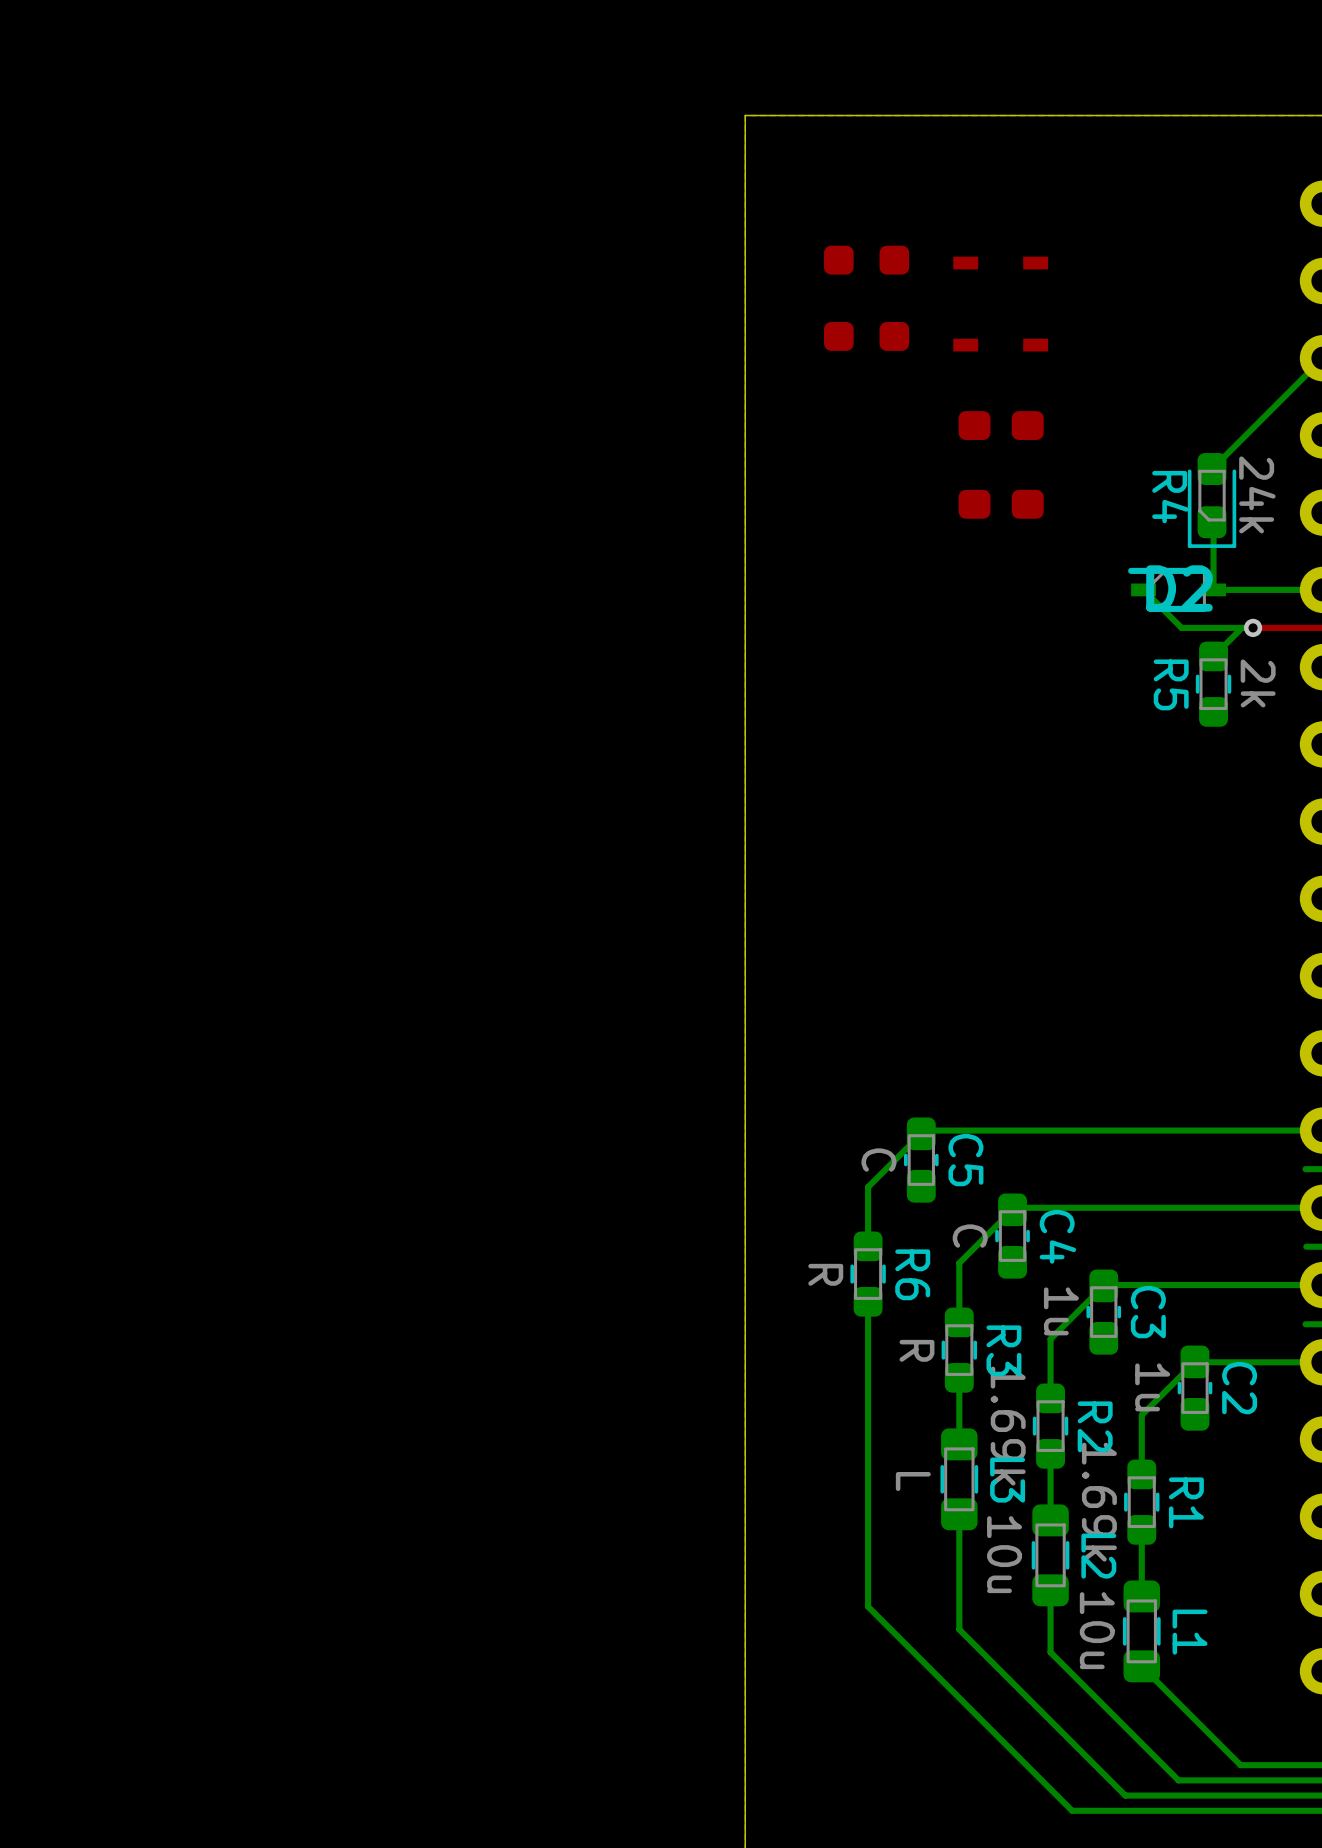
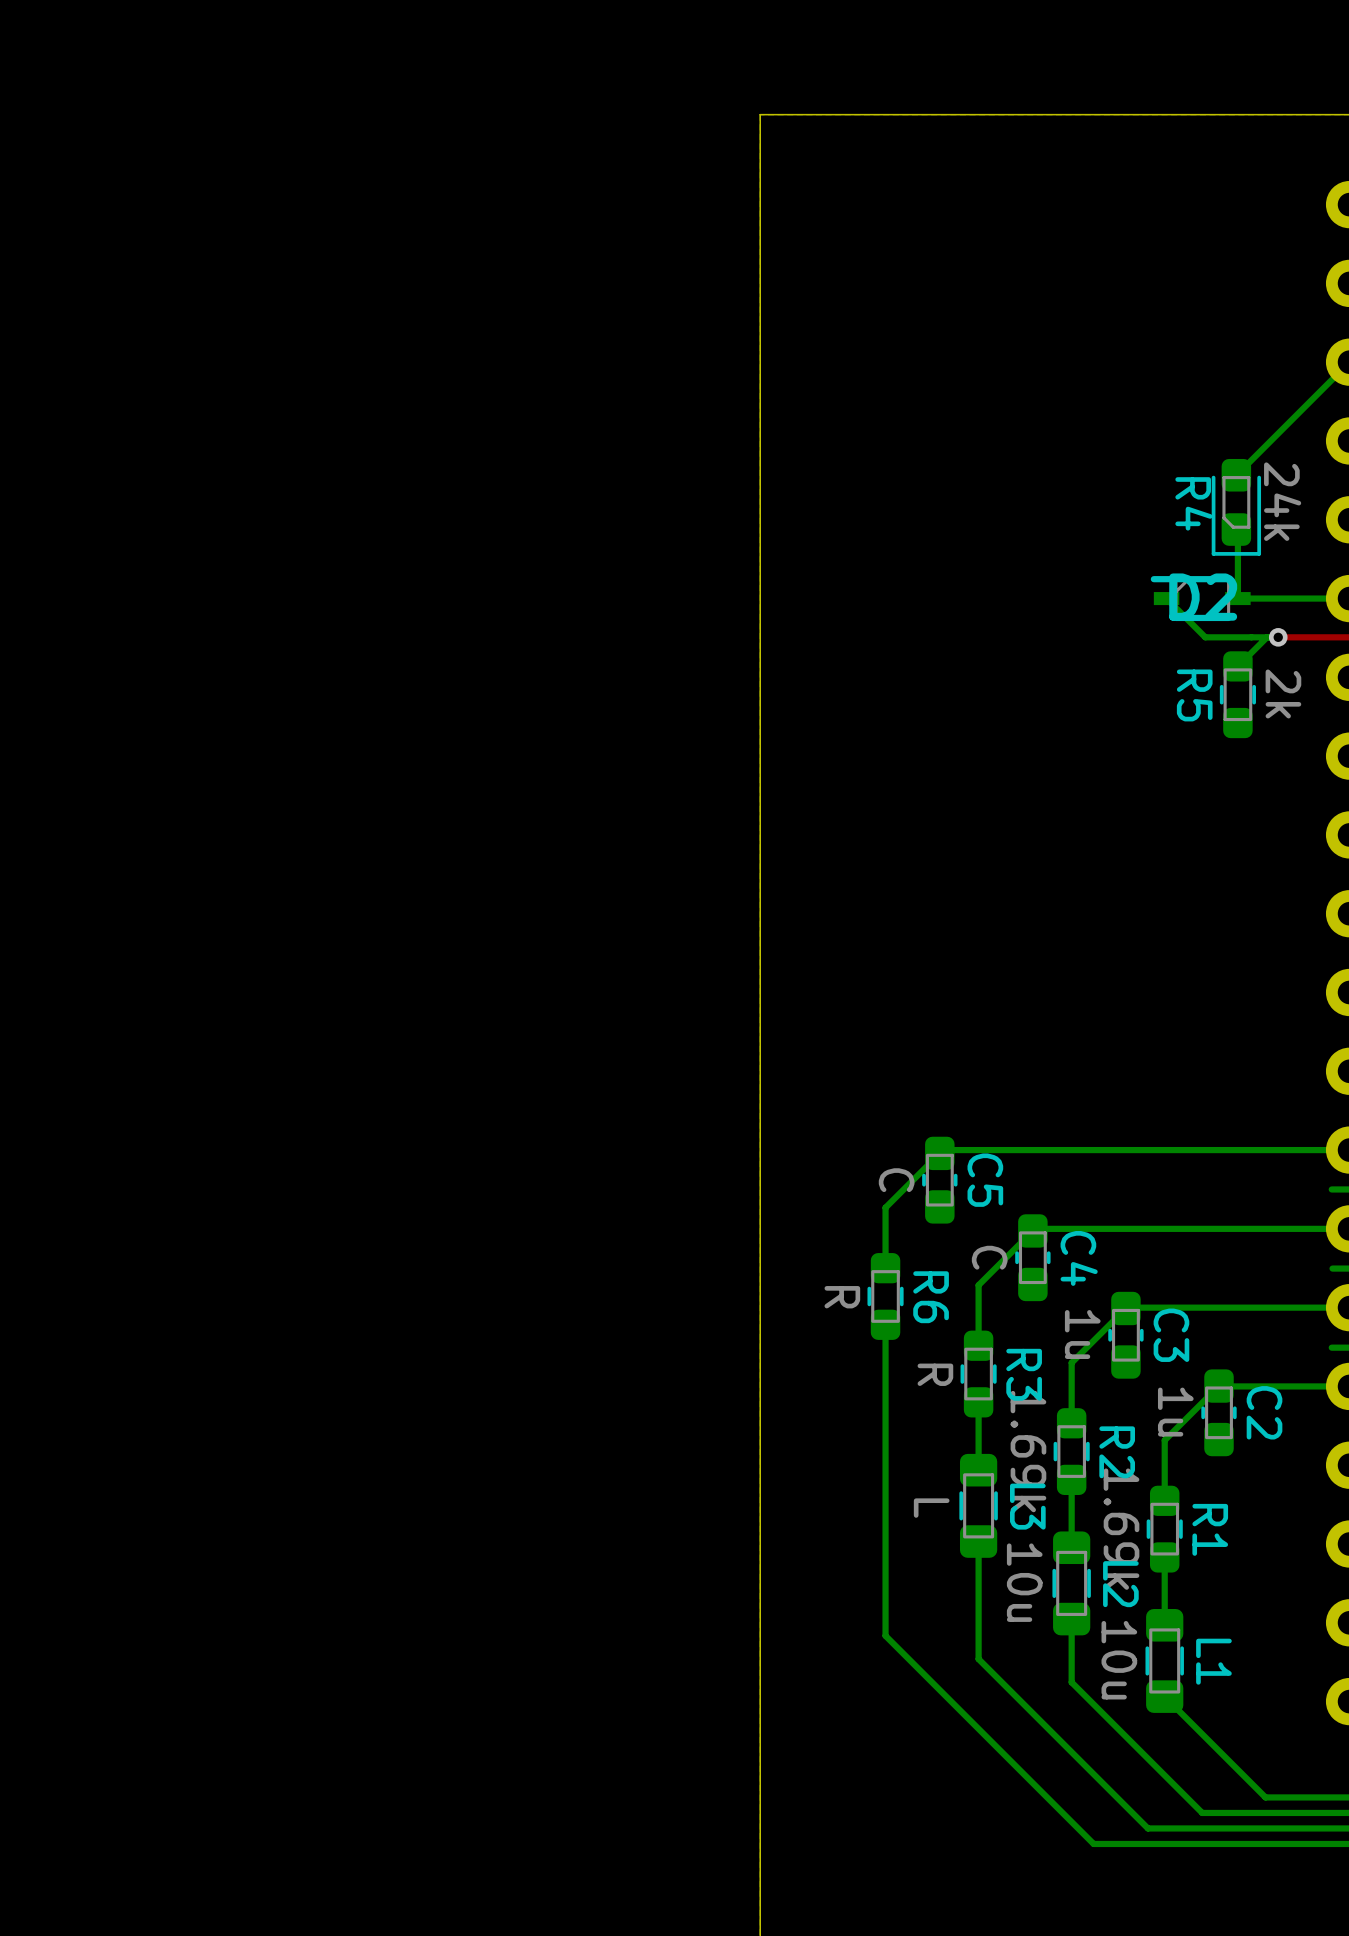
part: (866, 260) -> none
part: (1000, 263) -> none
part: (866, 336) -> none
part: (1000, 345) -> none
part: (1001, 425) -> none
part: (1001, 504) -> none

